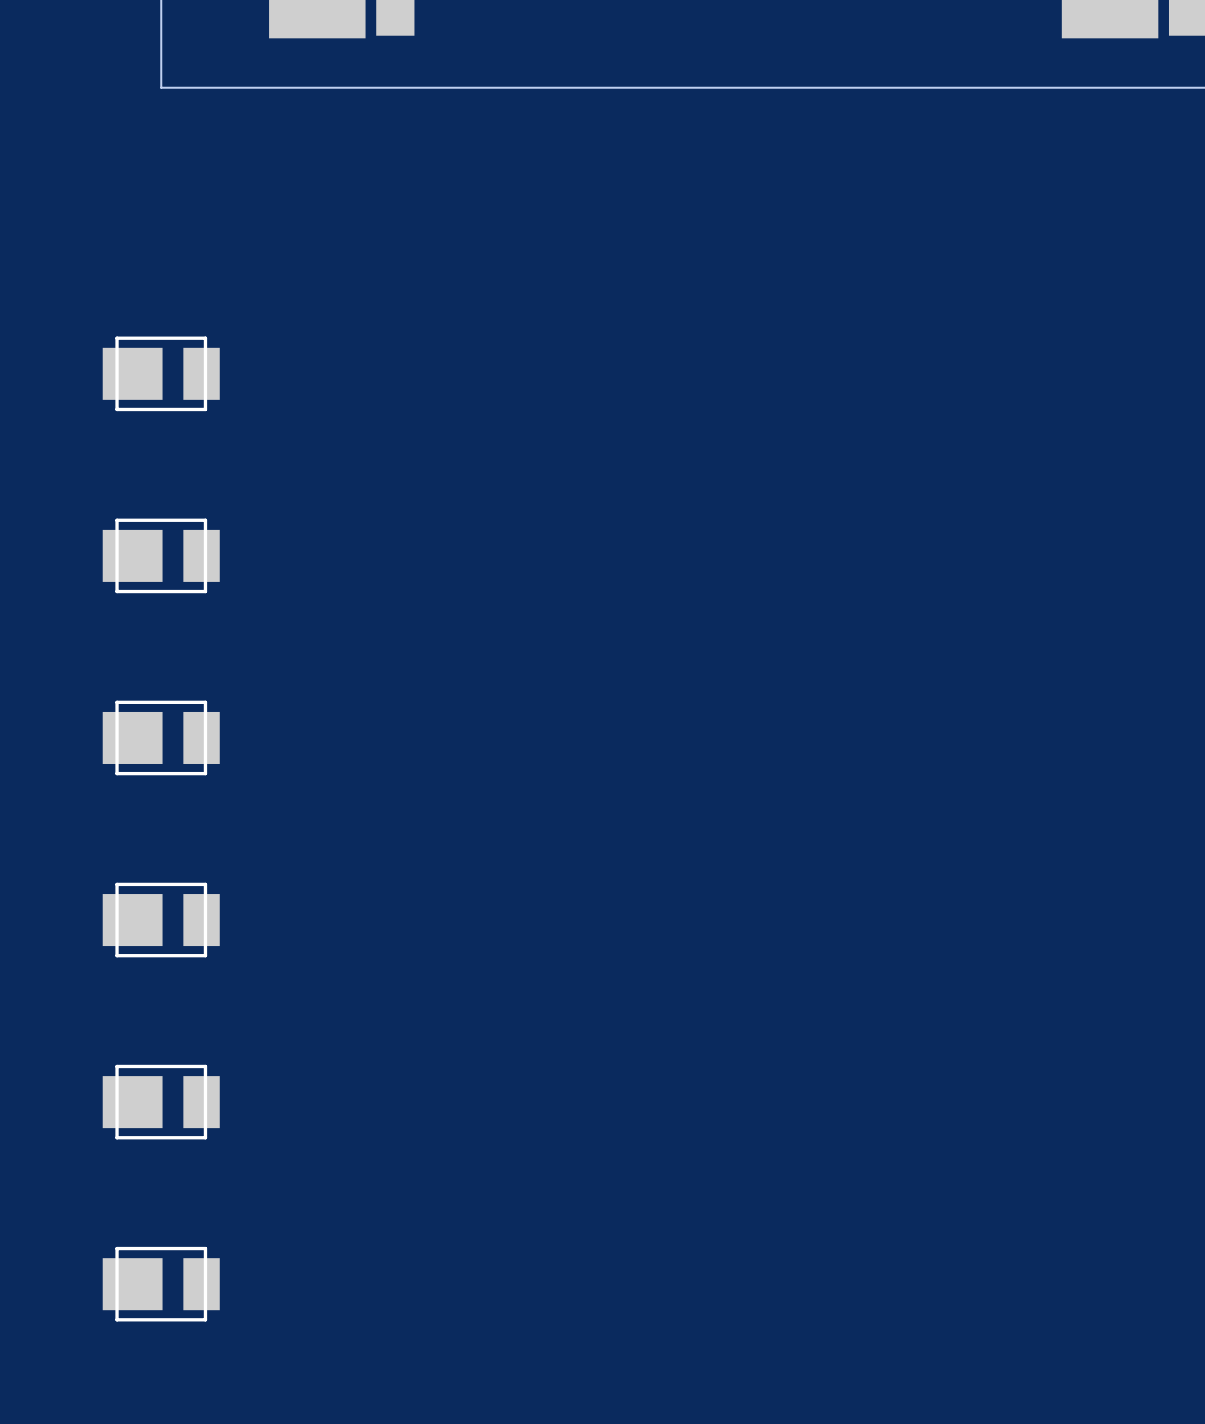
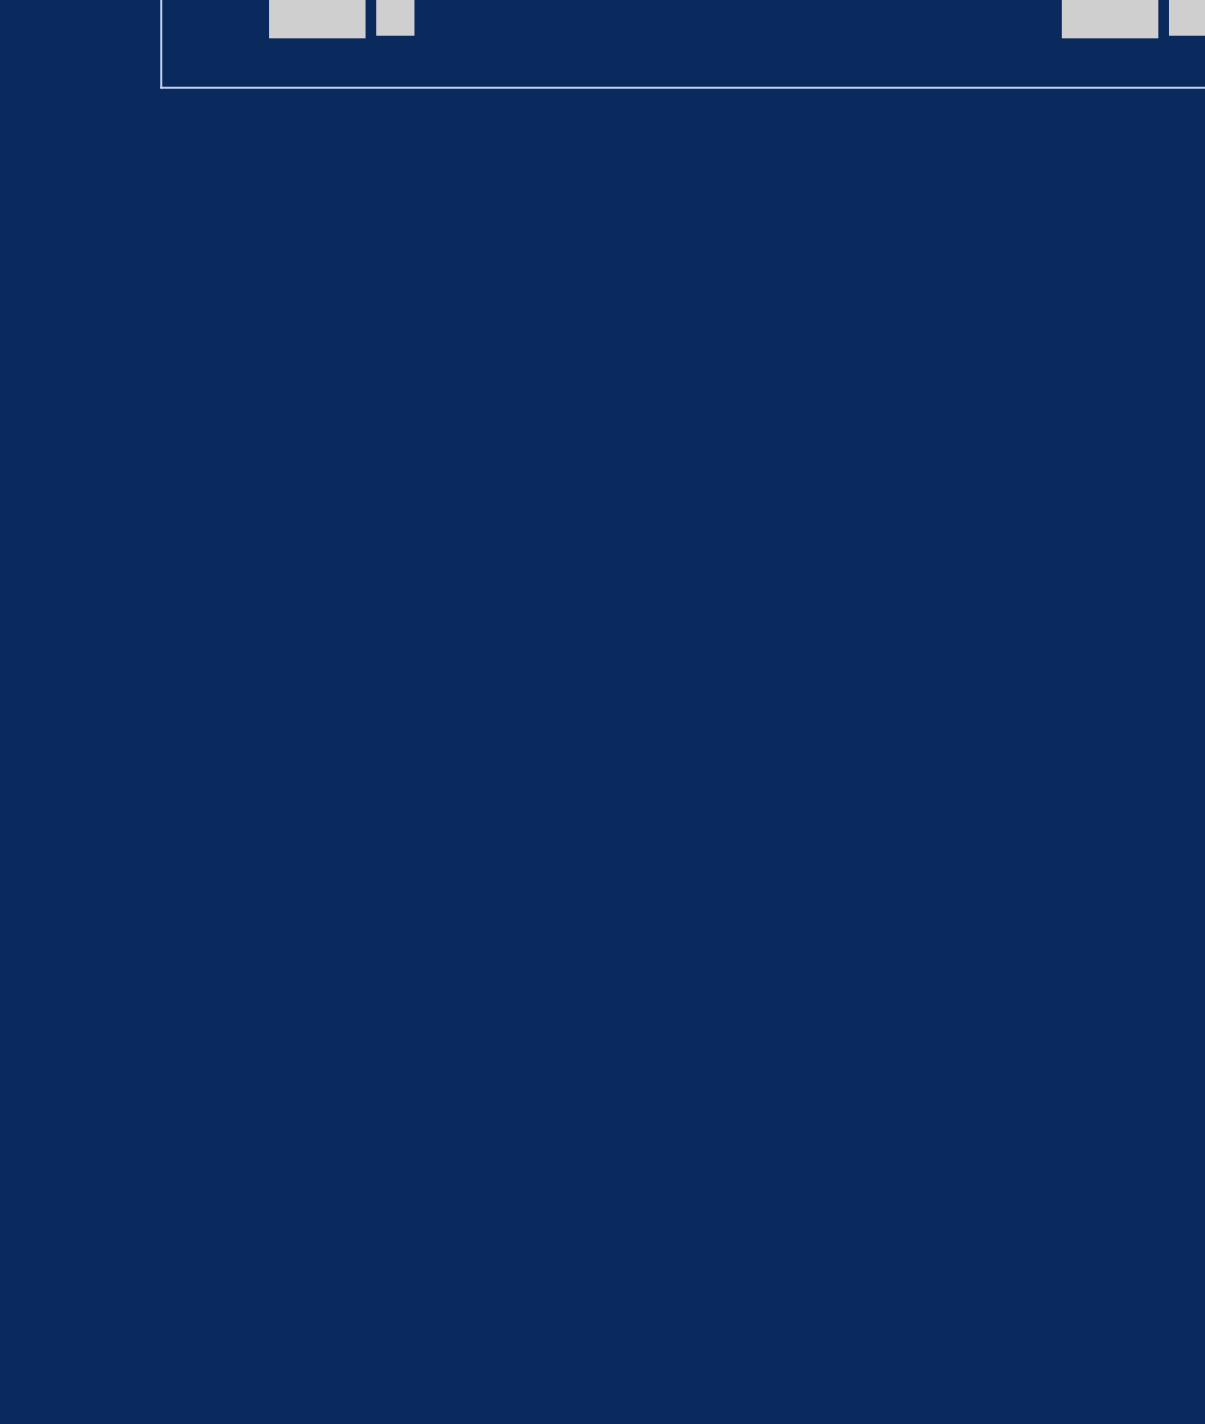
part: (161, 373) -> none
part: (161, 555) -> none
part: (161, 737) -> none
part: (161, 920) -> none
part: (161, 1102) -> none
part: (161, 1284) -> none

